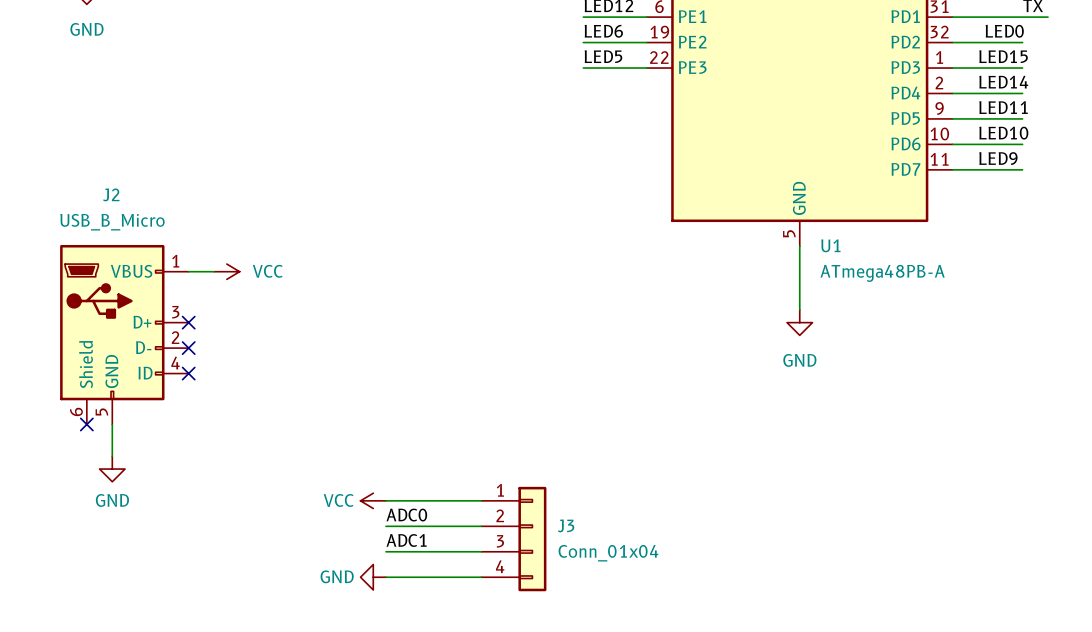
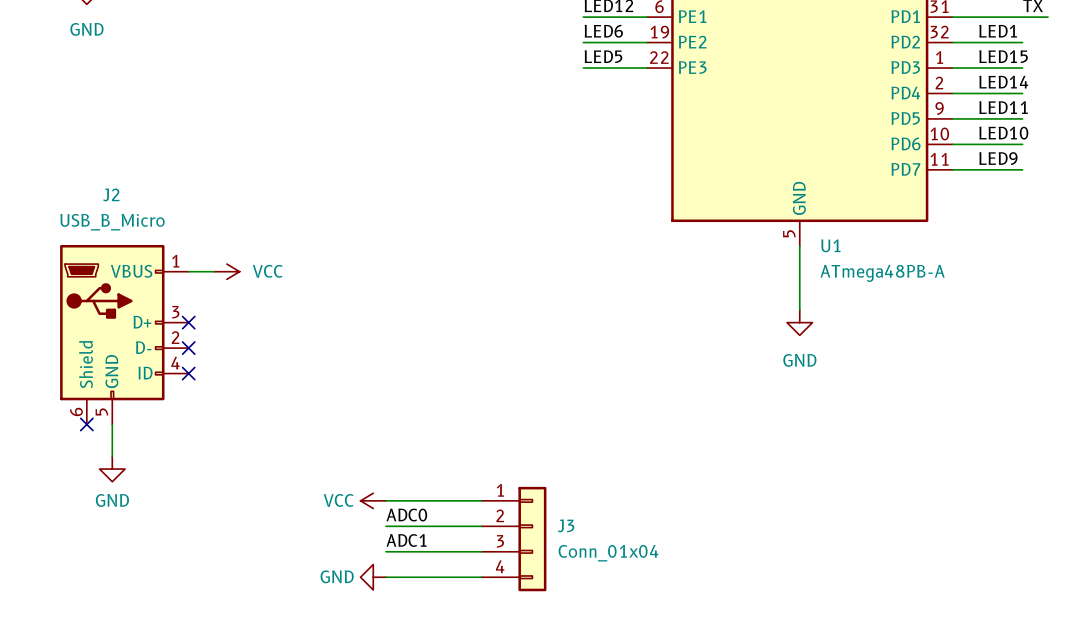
label: LED0 (1004, 31) -> LED1 (998, 31)

